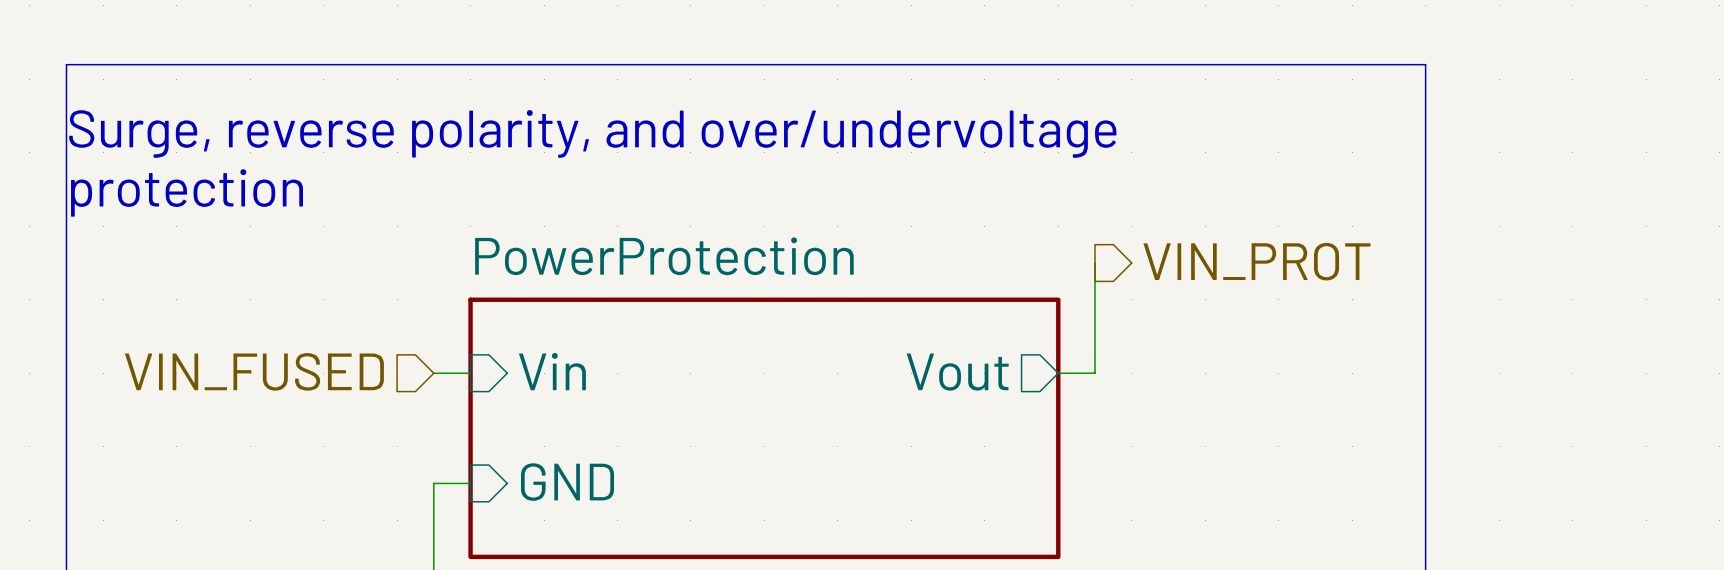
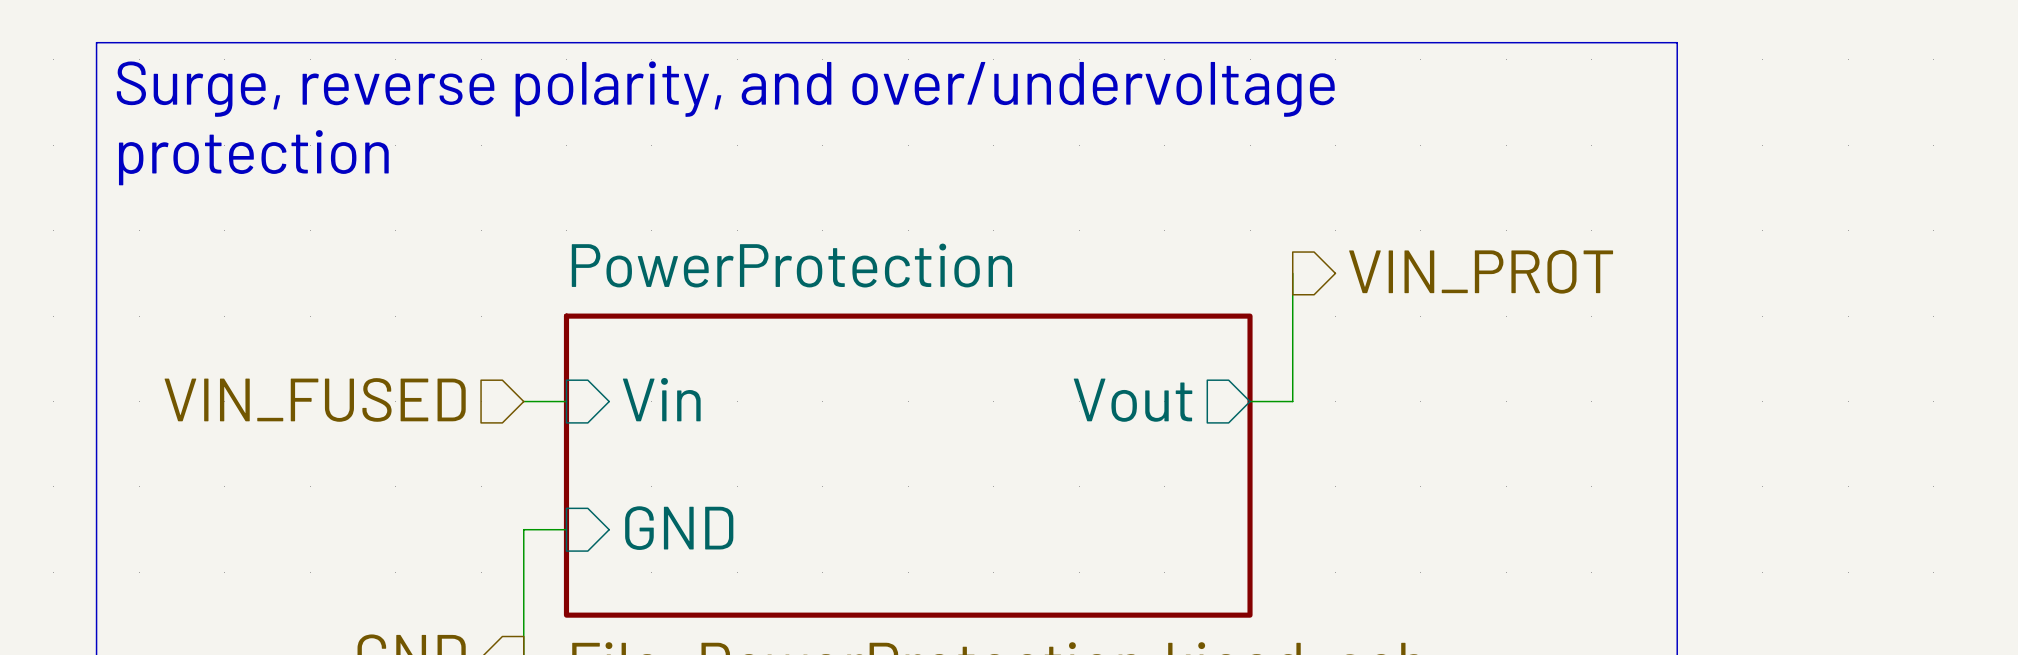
text position: Surge, reverse polarity, and over/undervoltage (592, 133) -> Surge, reverse polarity, and over/undervoltage (725, 89)
text position: protection (187, 192) -> protection (253, 157)

